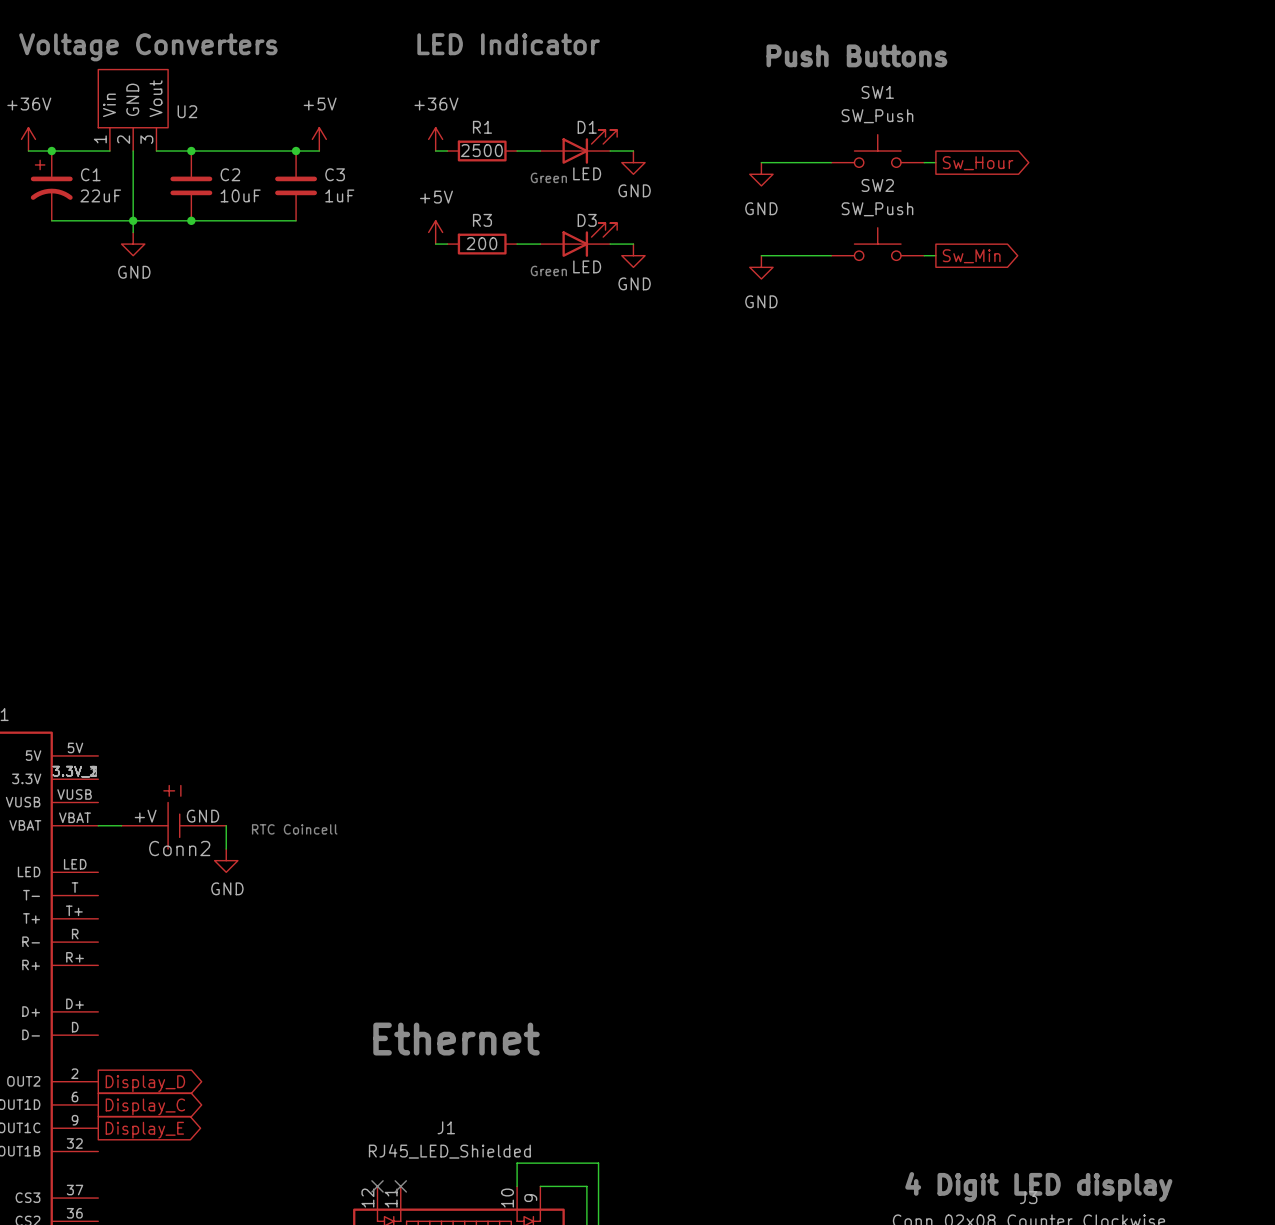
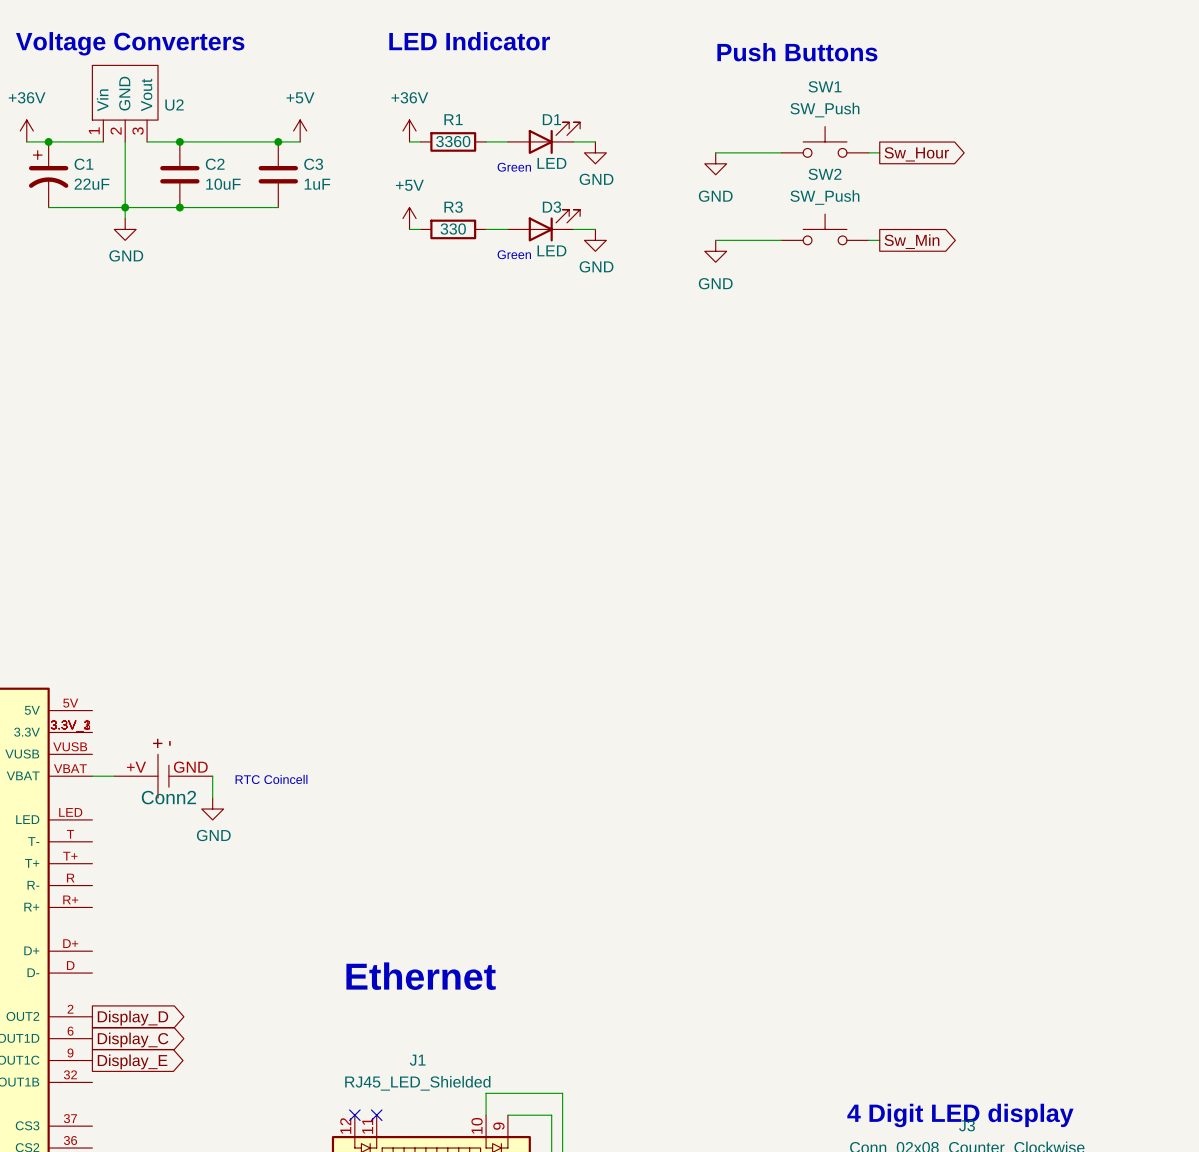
R1 value: 2500 (481, 150) -> 3360 (453, 141)
R3 value: 200 (481, 243) -> 330 (453, 229)

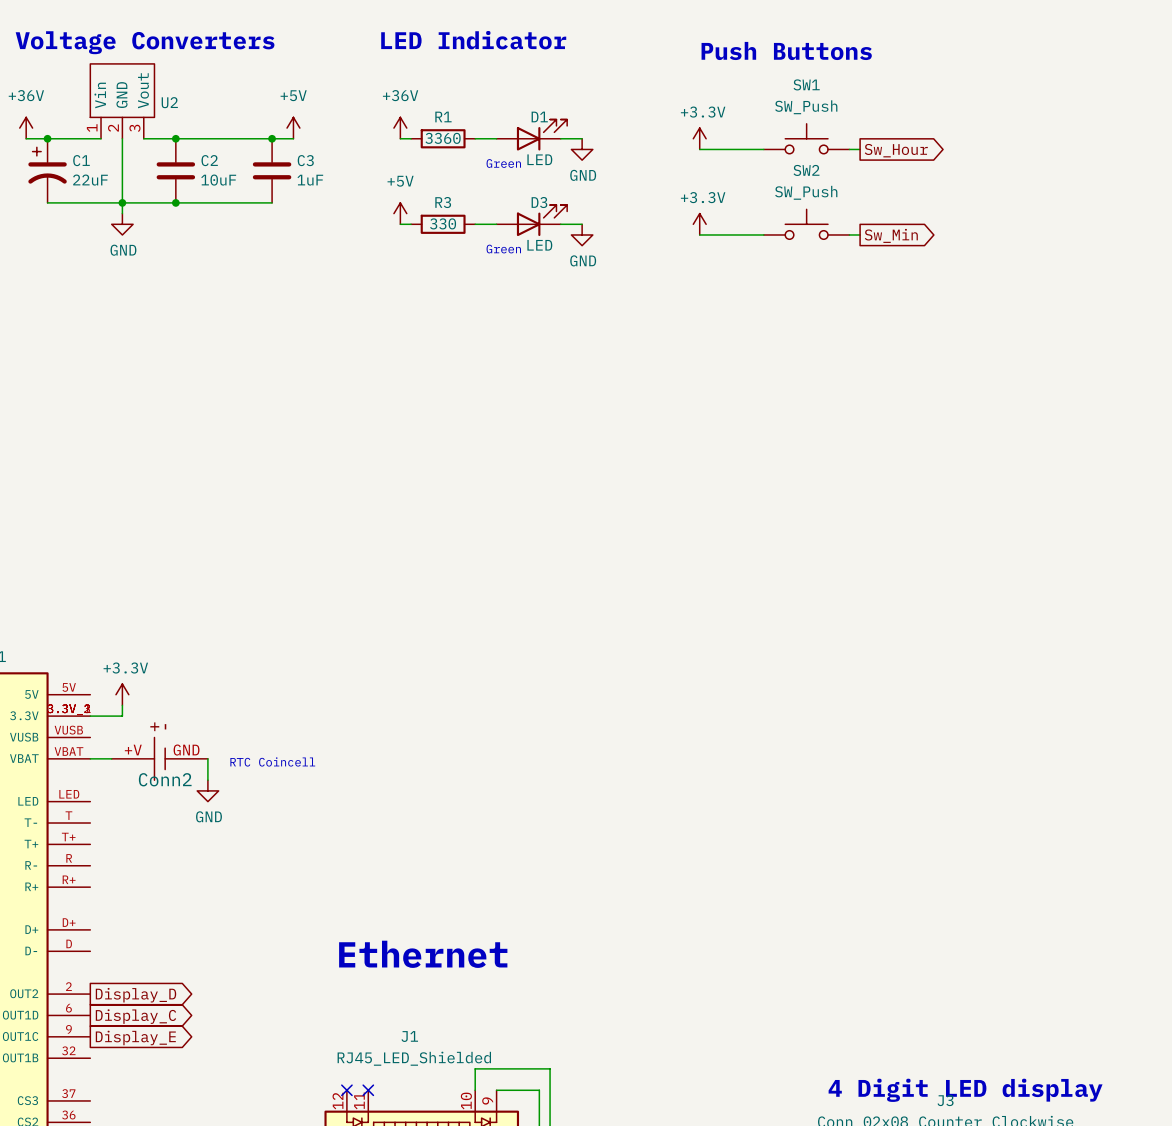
power symbol: none -> +3.3V (699, 138)
power symbol: GND (715, 163) -> none
power symbol: none -> +3.3V (699, 224)
power symbol: GND (715, 251) -> none
power symbol: none -> +3.3V (122, 694)
wire: none -> (122, 705) (122, 716) (90, 716)

